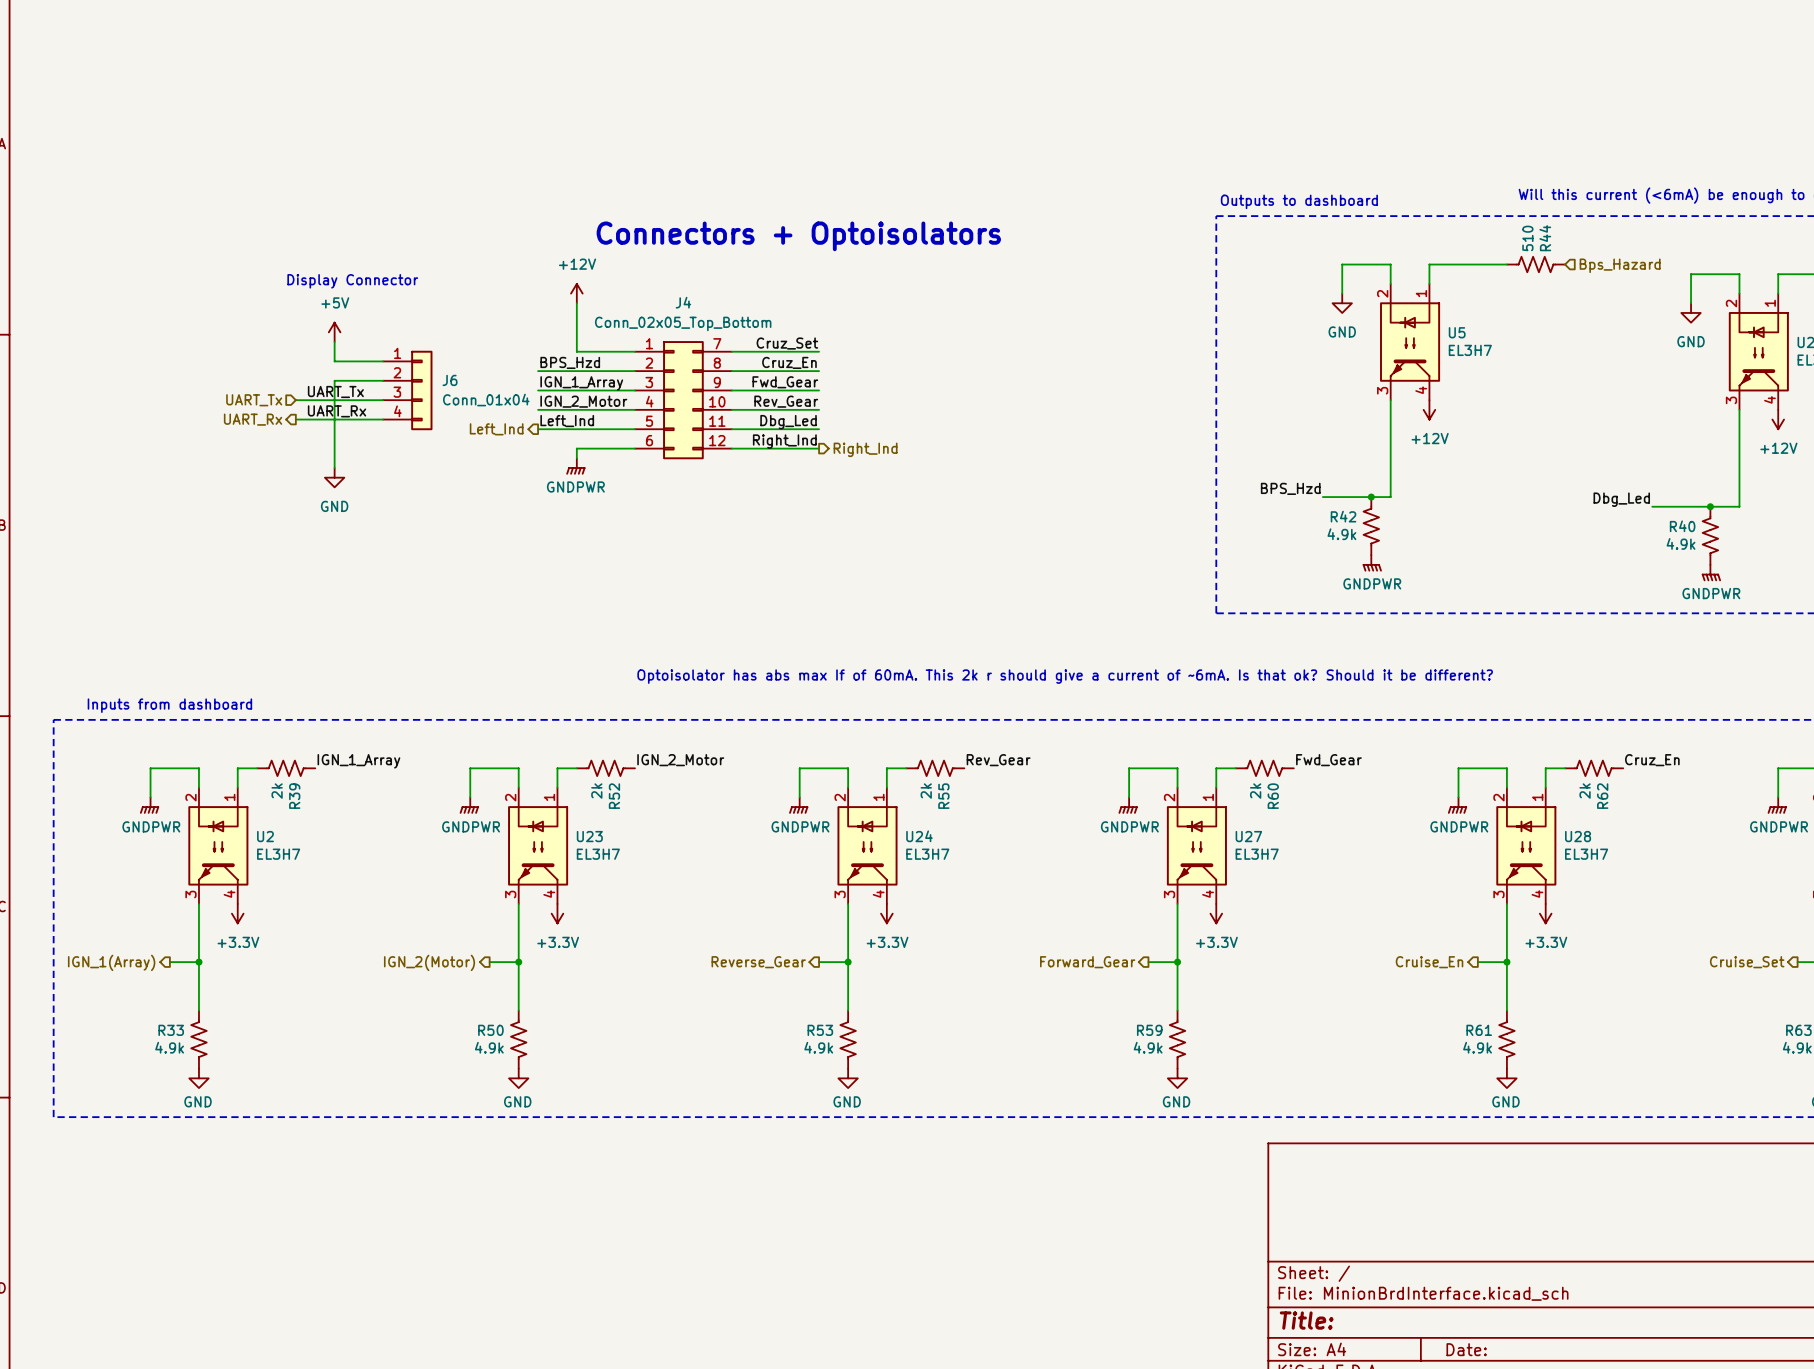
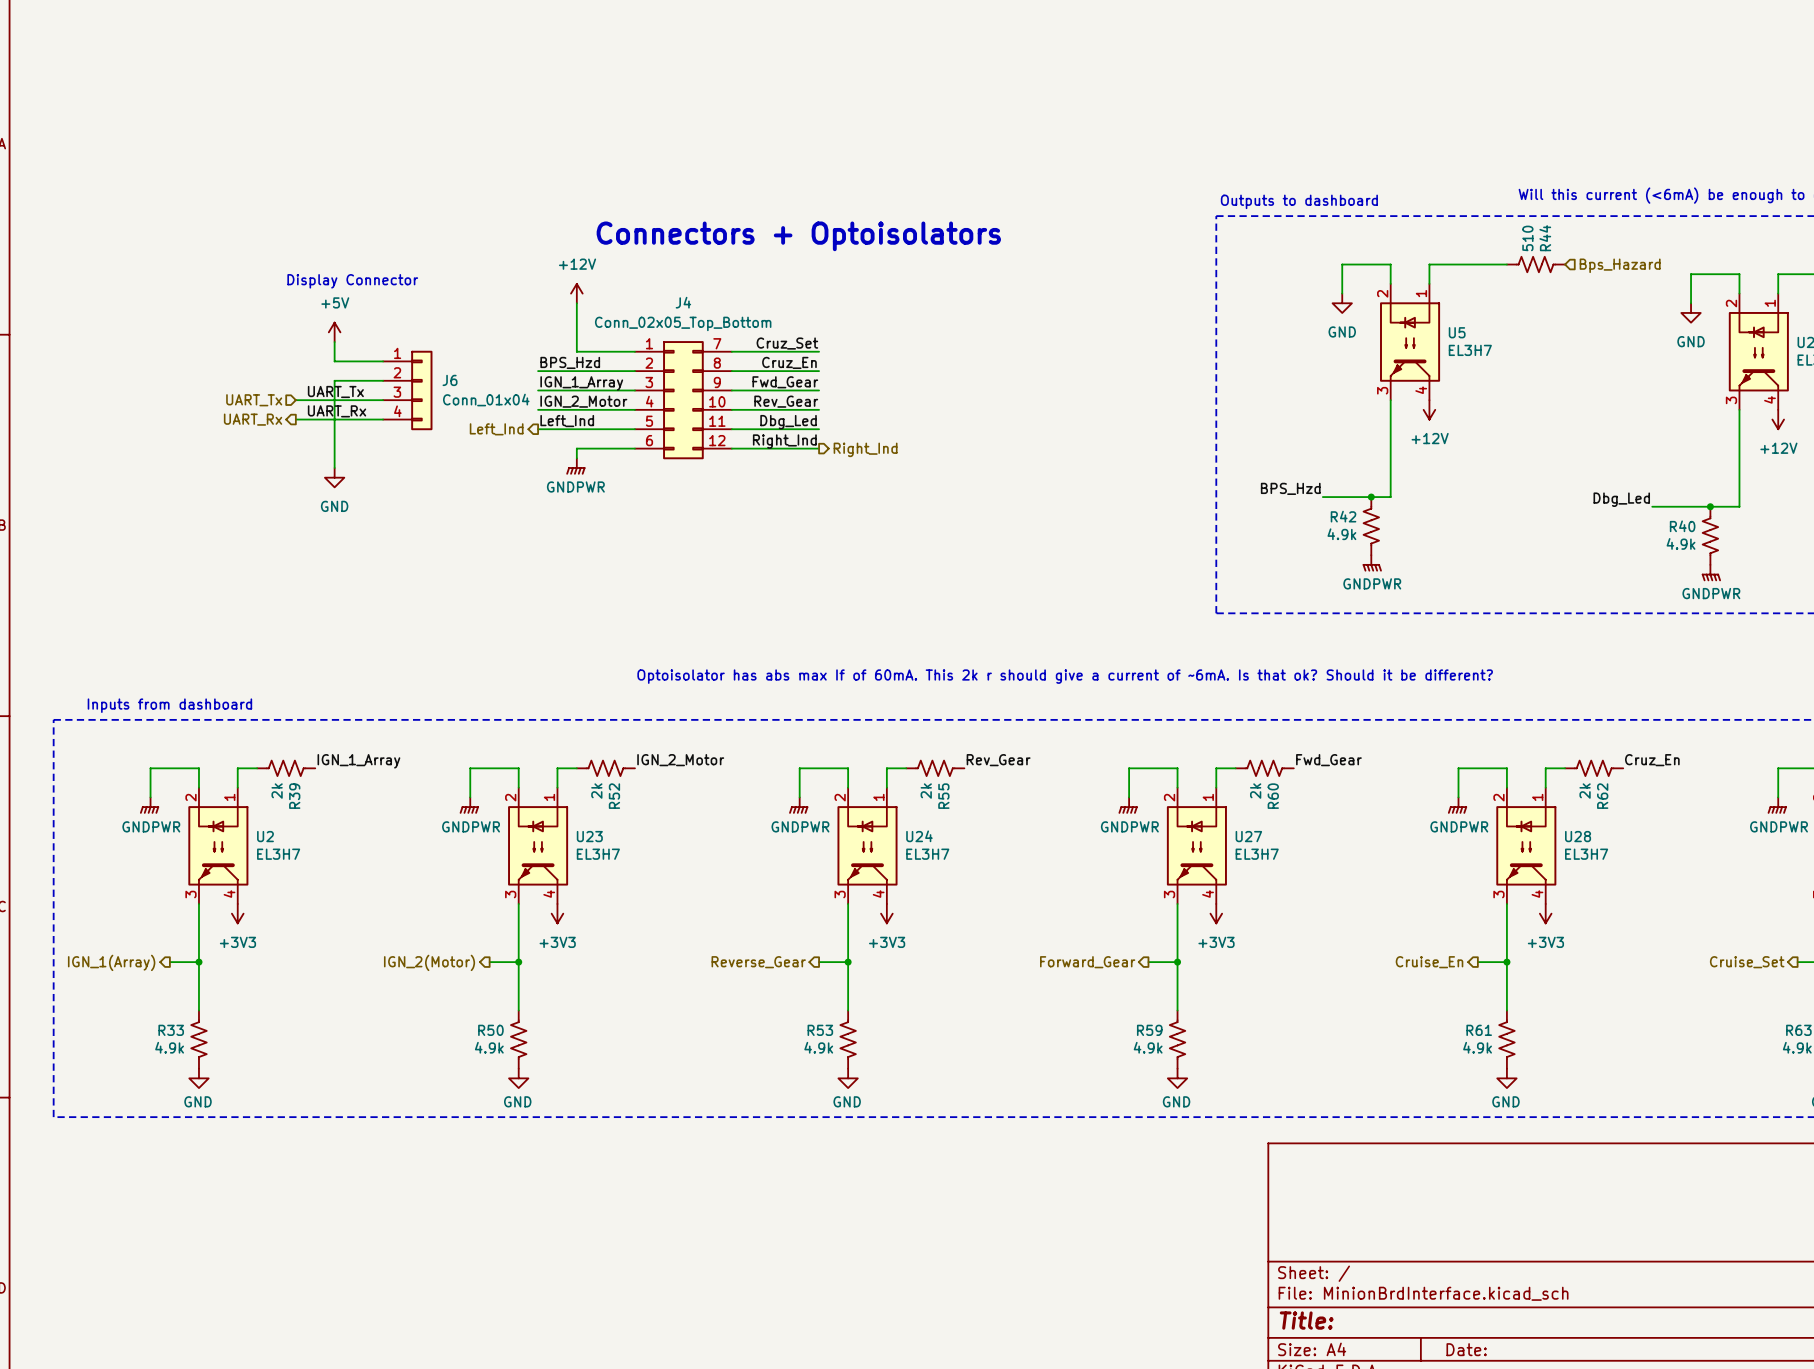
power symbol: +3.3V (237, 913) -> +3V3 (237, 913)
power symbol: +3.3V (557, 913) -> +3V3 (557, 913)
power symbol: +3.3V (886, 913) -> +3V3 (886, 913)
power symbol: +3.3V (1216, 913) -> +3V3 (1216, 913)
power symbol: +3.3V (1545, 913) -> +3V3 (1545, 913)

